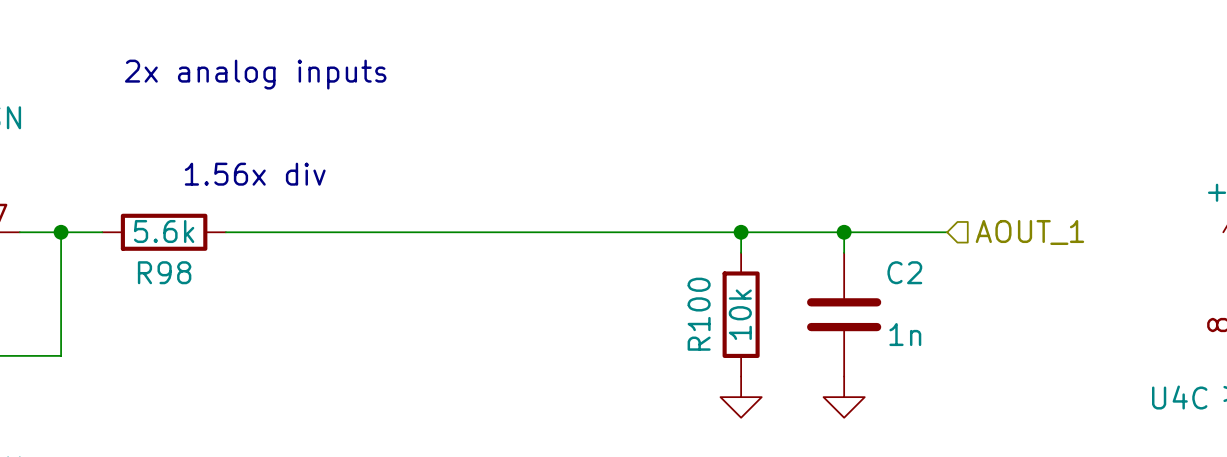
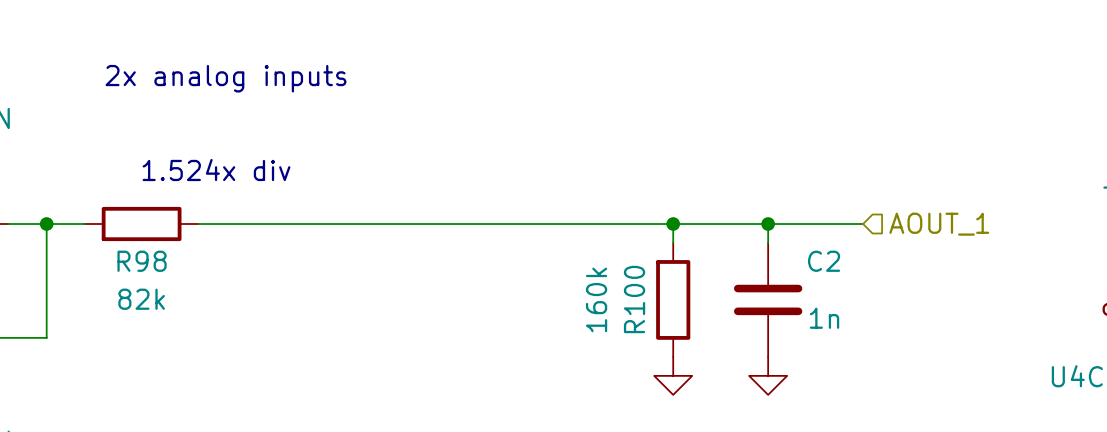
text: 1.56x div (255, 174) -> 1.524x div (216, 170)
R98 value: 5.6k (164, 231) -> 82k (141, 299)
R100 value: 10k (740, 314) -> 160k (596, 299)

